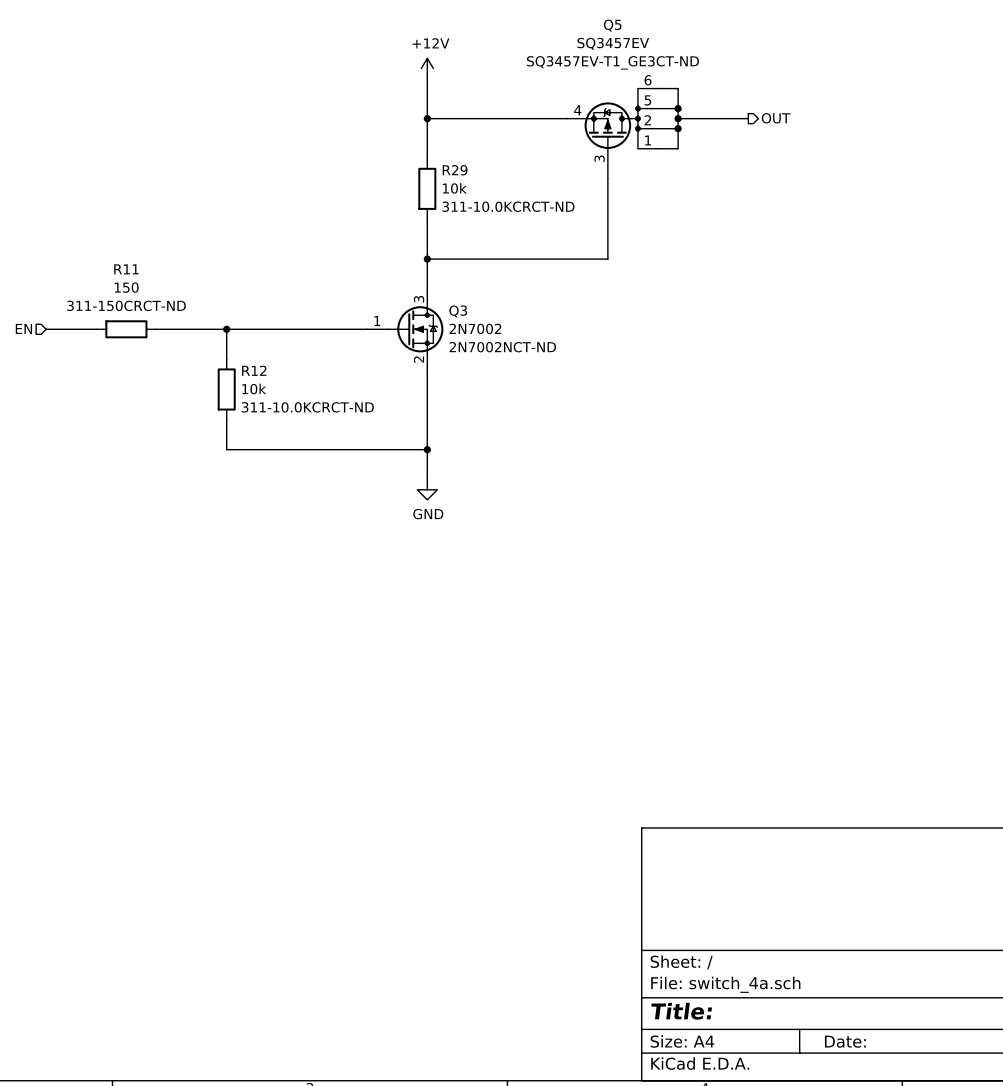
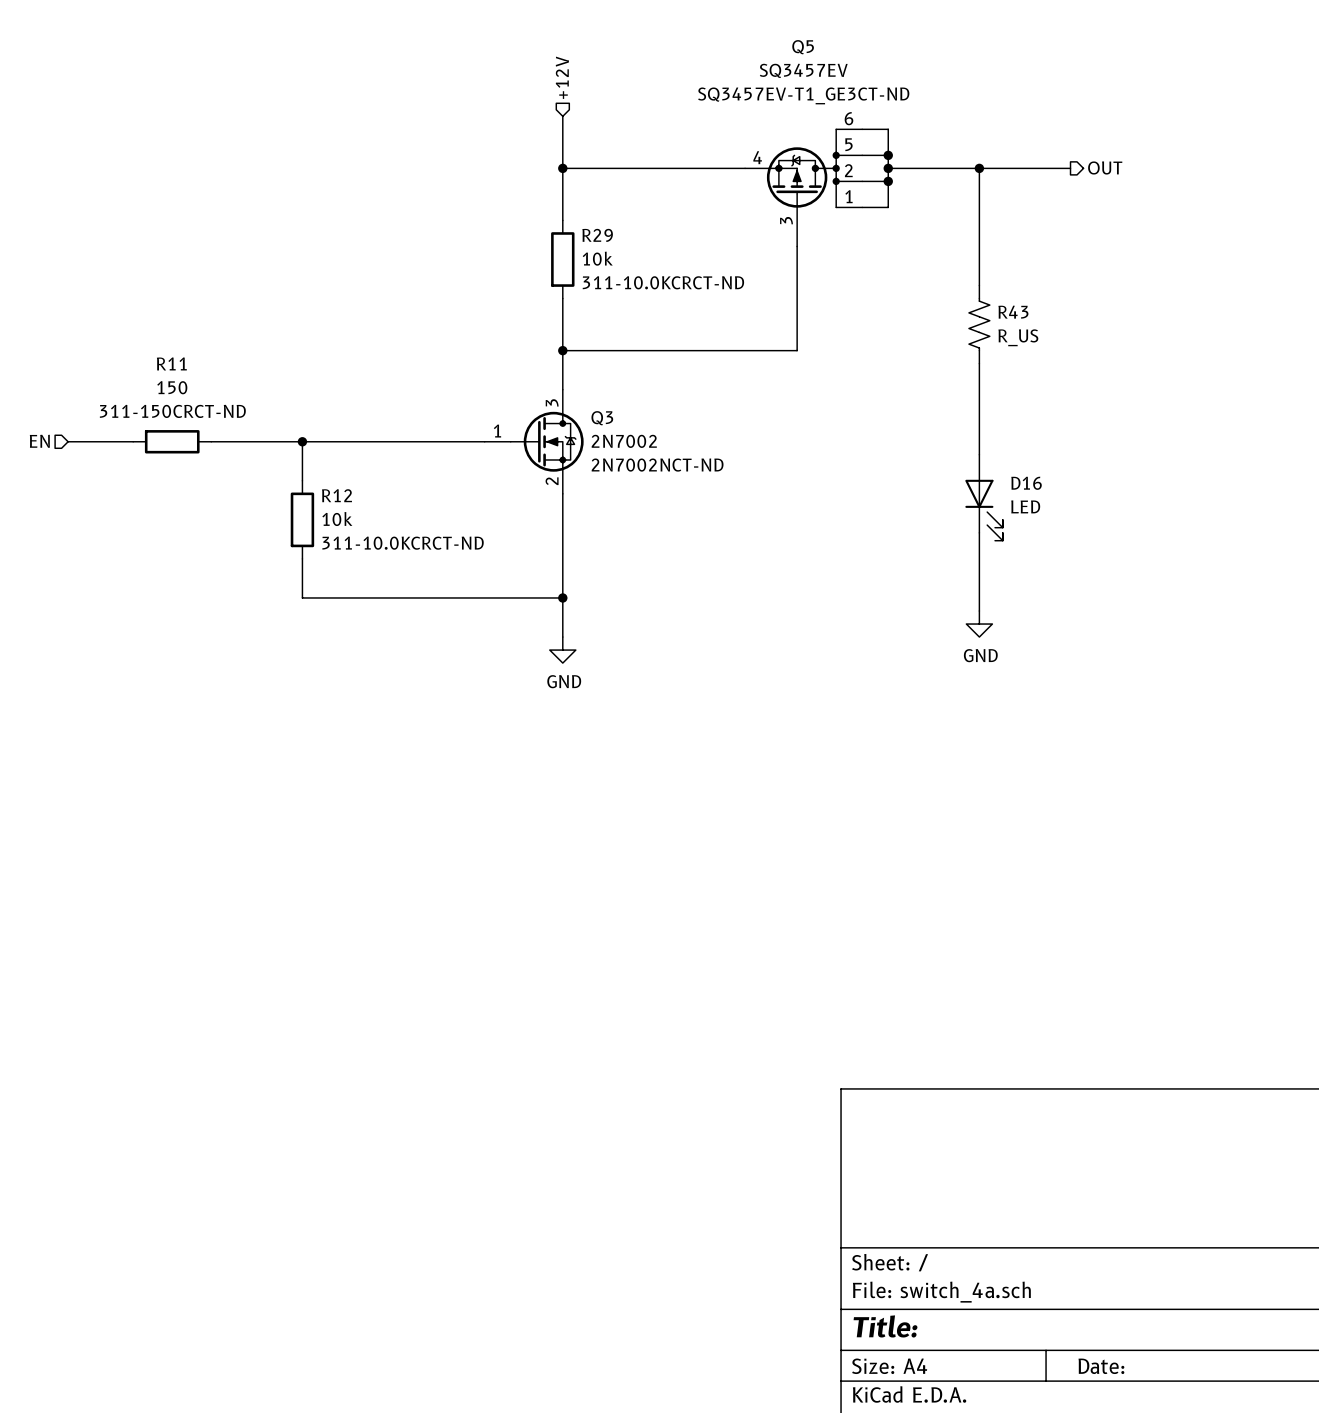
hierarchical label: none -> +12V (562, 77)
power symbol: +12V (427, 68) -> none
junction: none -> (979, 168)
hierarchical label position: OUT (776, 118) -> OUT (1105, 167)
wire: none -> (1070, 168) (979, 168) (979, 285)
R43: none -> R_US (979, 324)
wire: none -> (979, 363) (979, 454)
D16: none -> LED (984, 497)
wire: none -> (979, 532) (979, 611)
power symbol: none -> GND (979, 624)

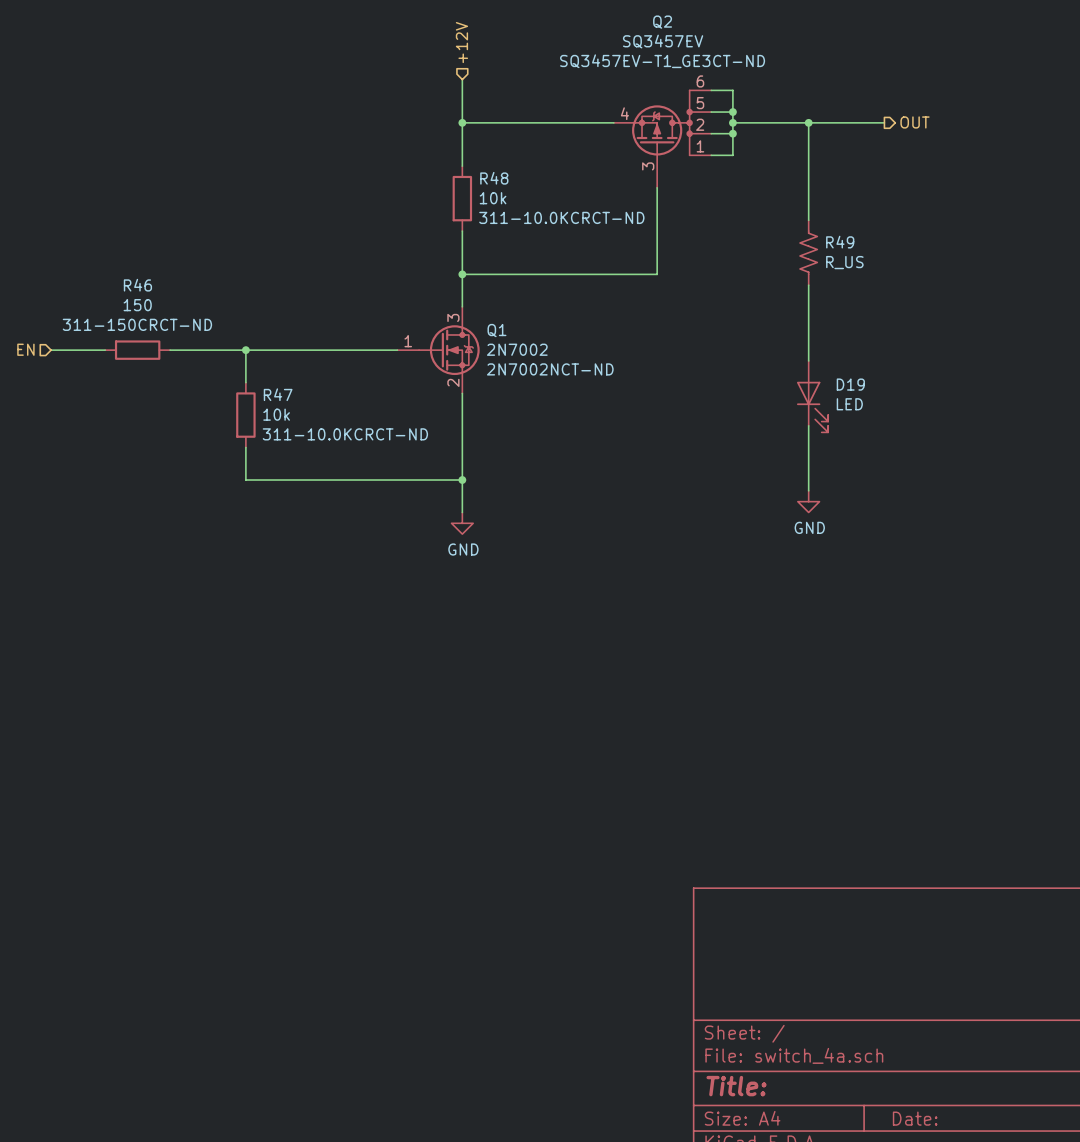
Q5 name: Q5 (803, 47) -> Q2 (662, 22)
R29 name: R29 (597, 235) -> R48 (494, 178)
R43 name: R43 (1013, 312) -> R49 (840, 242)
R11 name: R11 (171, 363) -> R46 (137, 285)
Q3 name: Q3 (602, 418) -> Q1 (496, 330)
D16 name: D16 (1026, 483) -> D19 (850, 384)
R12 name: R12 (336, 495) -> R47 (278, 394)

